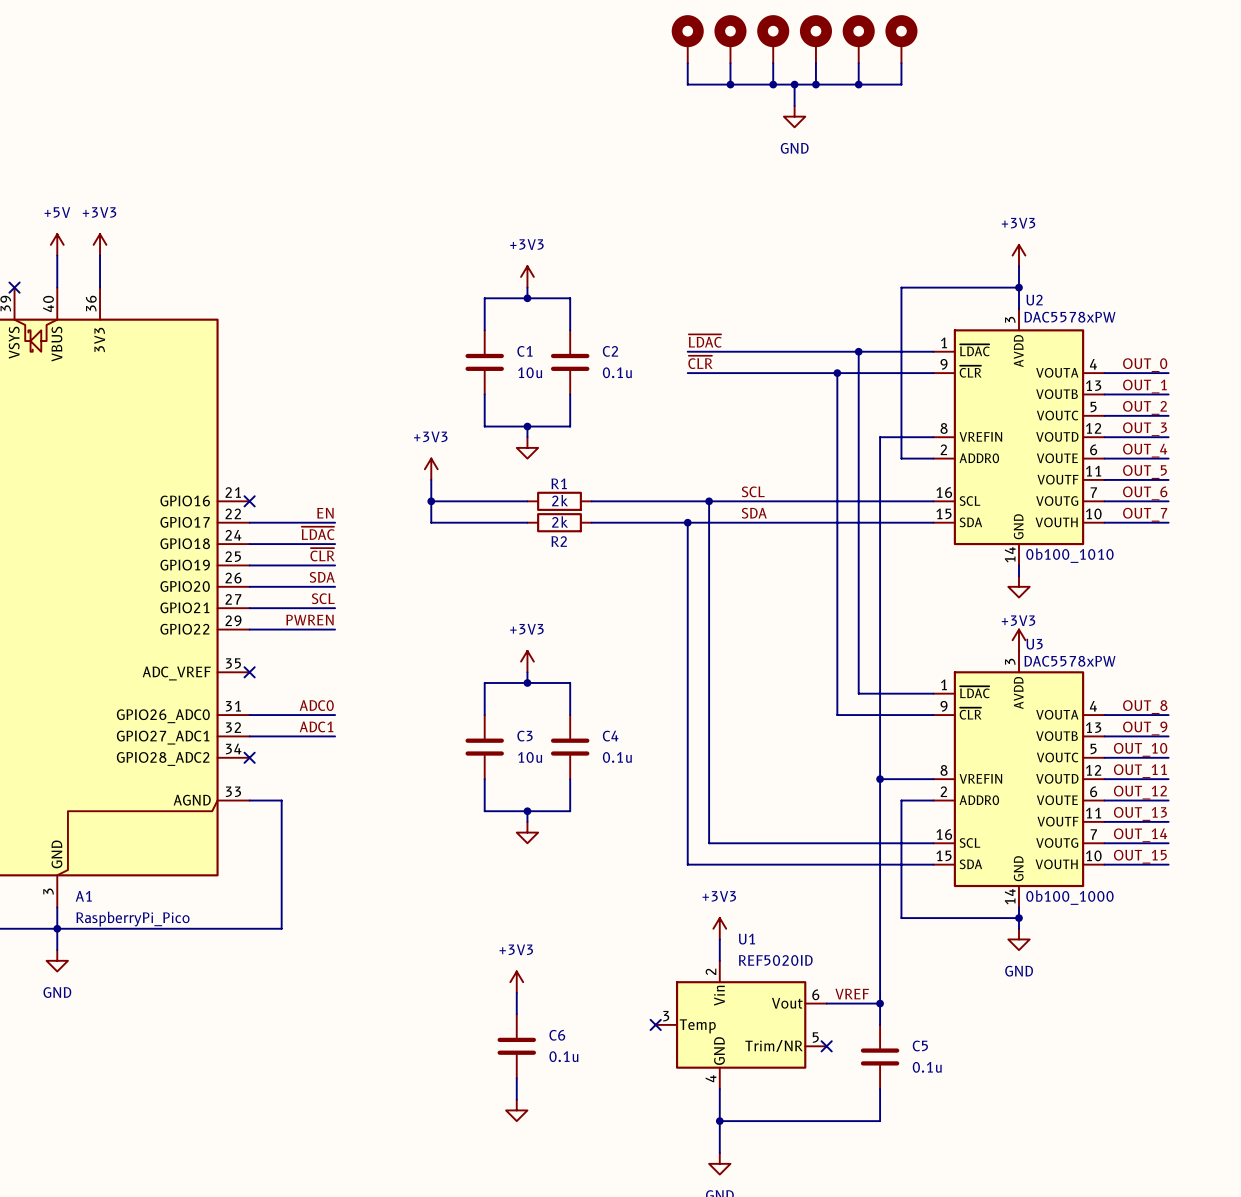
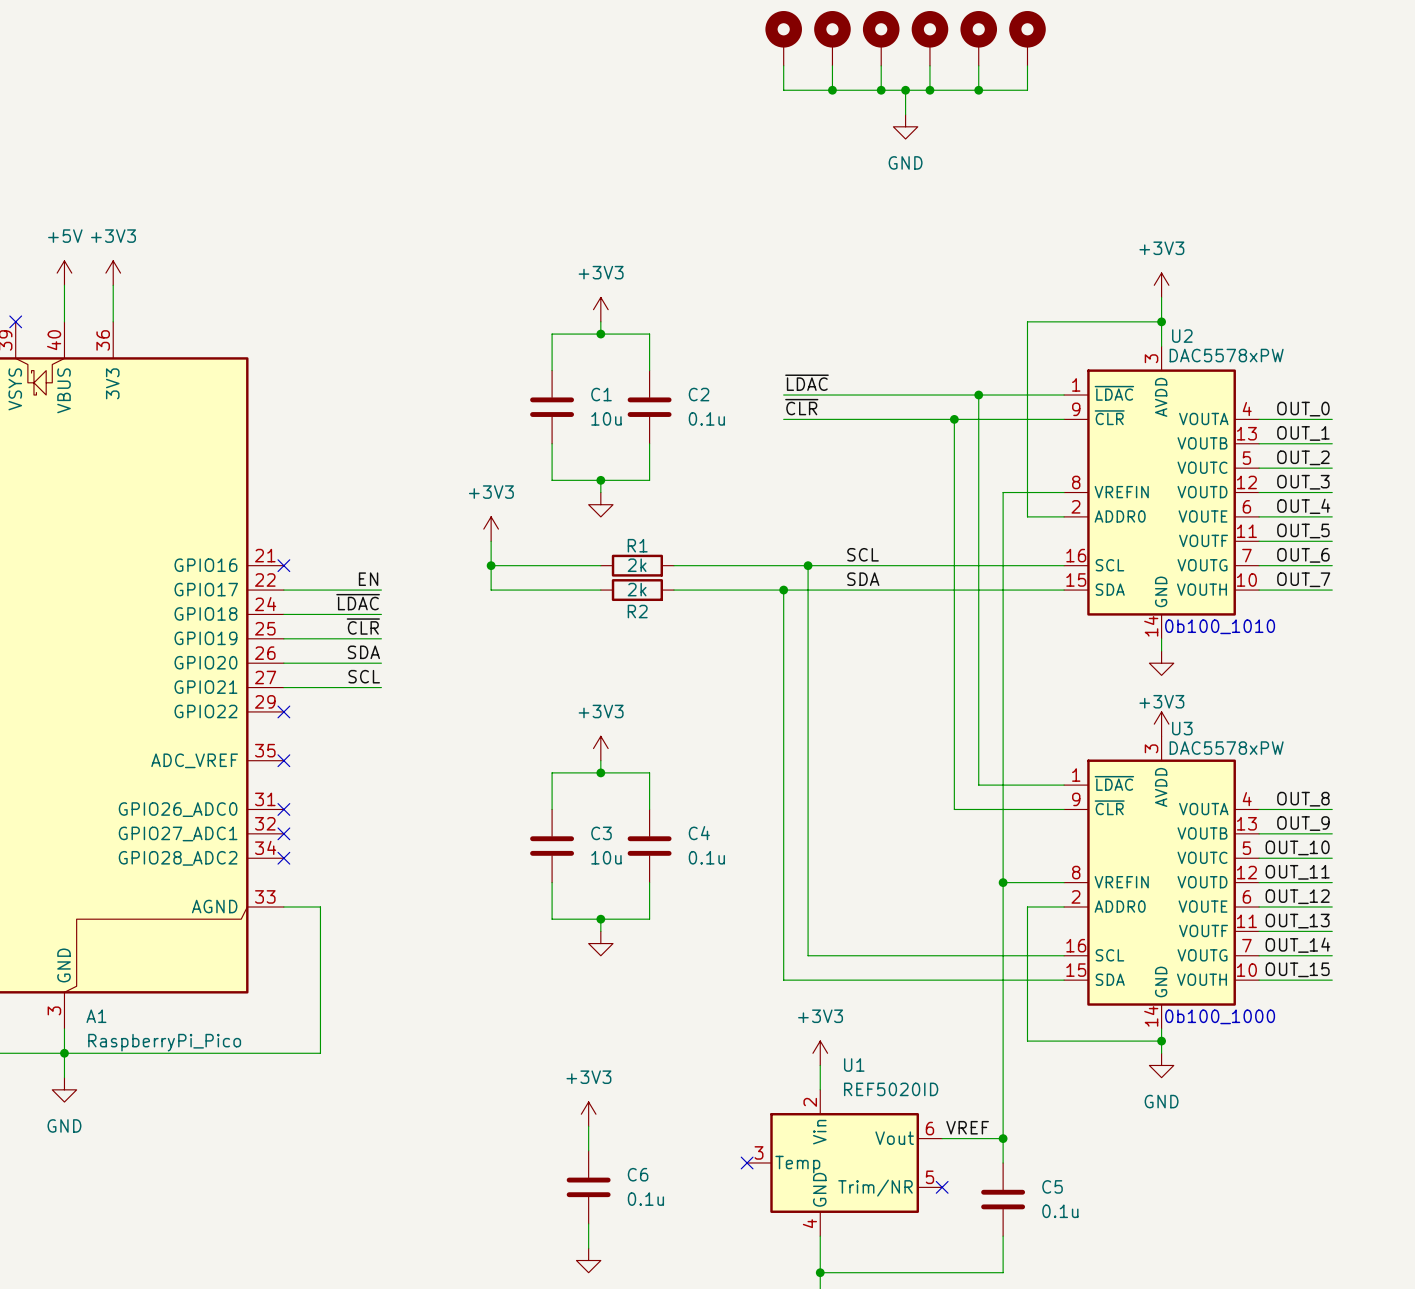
label: PWREN (309, 620) -> none
wire: (249, 629) (335, 629) -> none
no-connect mark: none -> (283, 711)
label: ADC0 (316, 705) -> none
wire: (249, 715) (335, 715) -> none
no-connect mark: none -> (283, 809)
label: ADC1 (316, 726) -> none
wire: (249, 736) (335, 736) -> none
no-connect mark: none -> (283, 833)

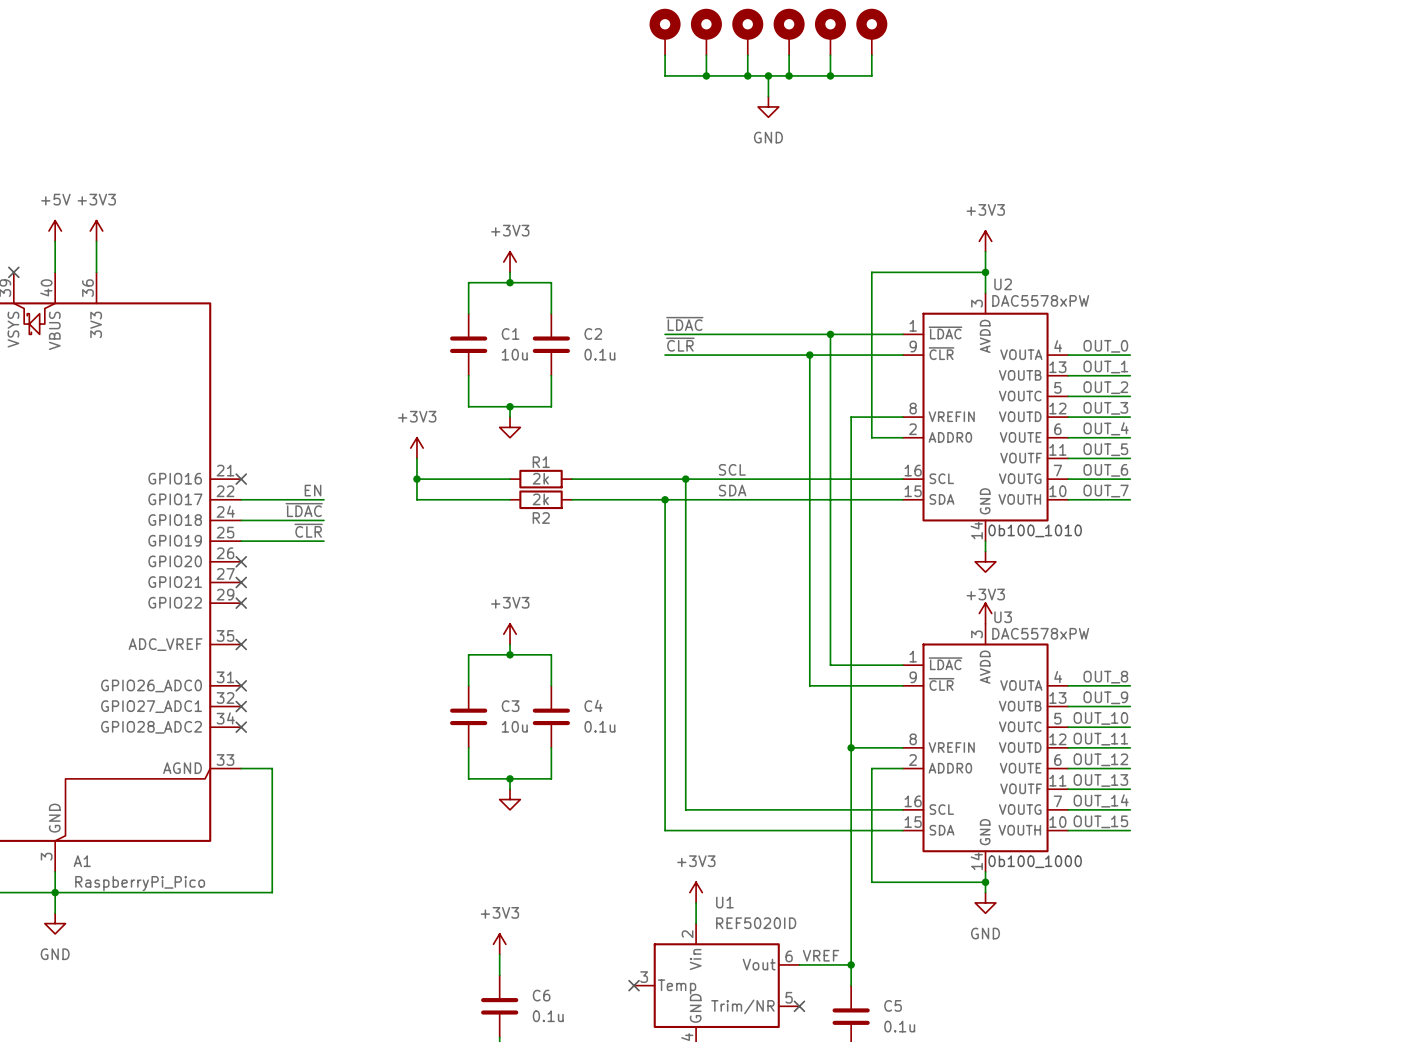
label: SDA (363, 652) -> none
wire: (283, 663) (381, 663) -> none
no-connect mark: none -> (241, 561)
label: SCL (364, 676) -> none
wire: (283, 687) (381, 687) -> none
no-connect mark: none -> (241, 582)

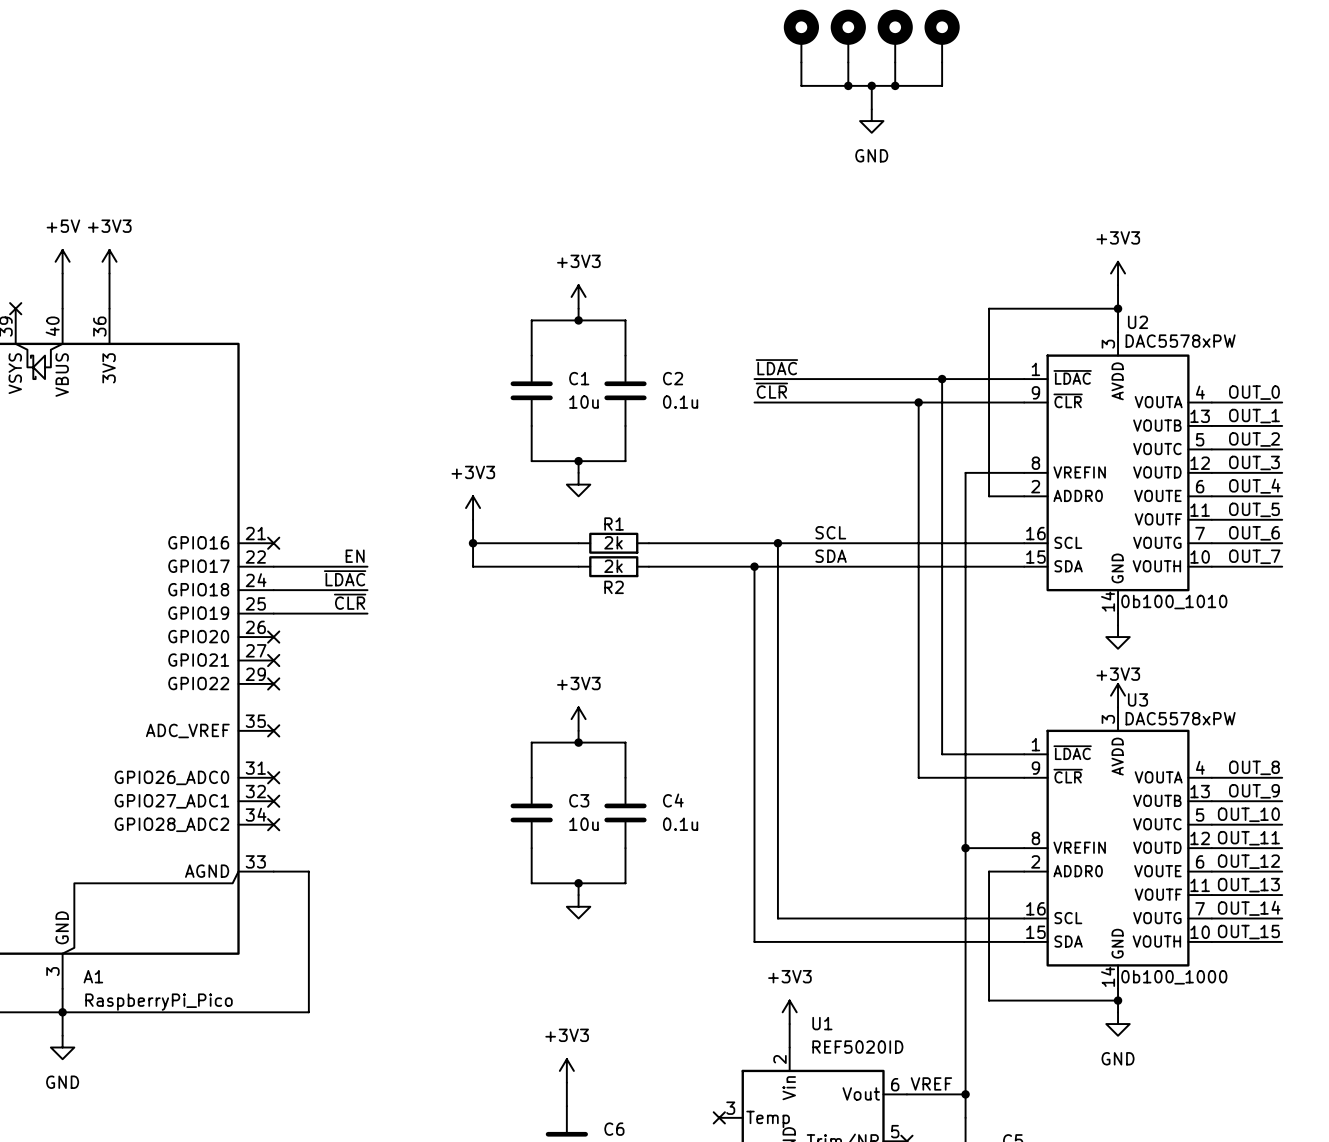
part: (665, 32) -> none
part: (871, 32) -> none
wire: (665, 55) (665, 75) (706, 75) -> none
wire: (871, 55) (871, 75) (830, 75) -> none
junction: (706, 75) -> none
junction: (830, 75) -> none

